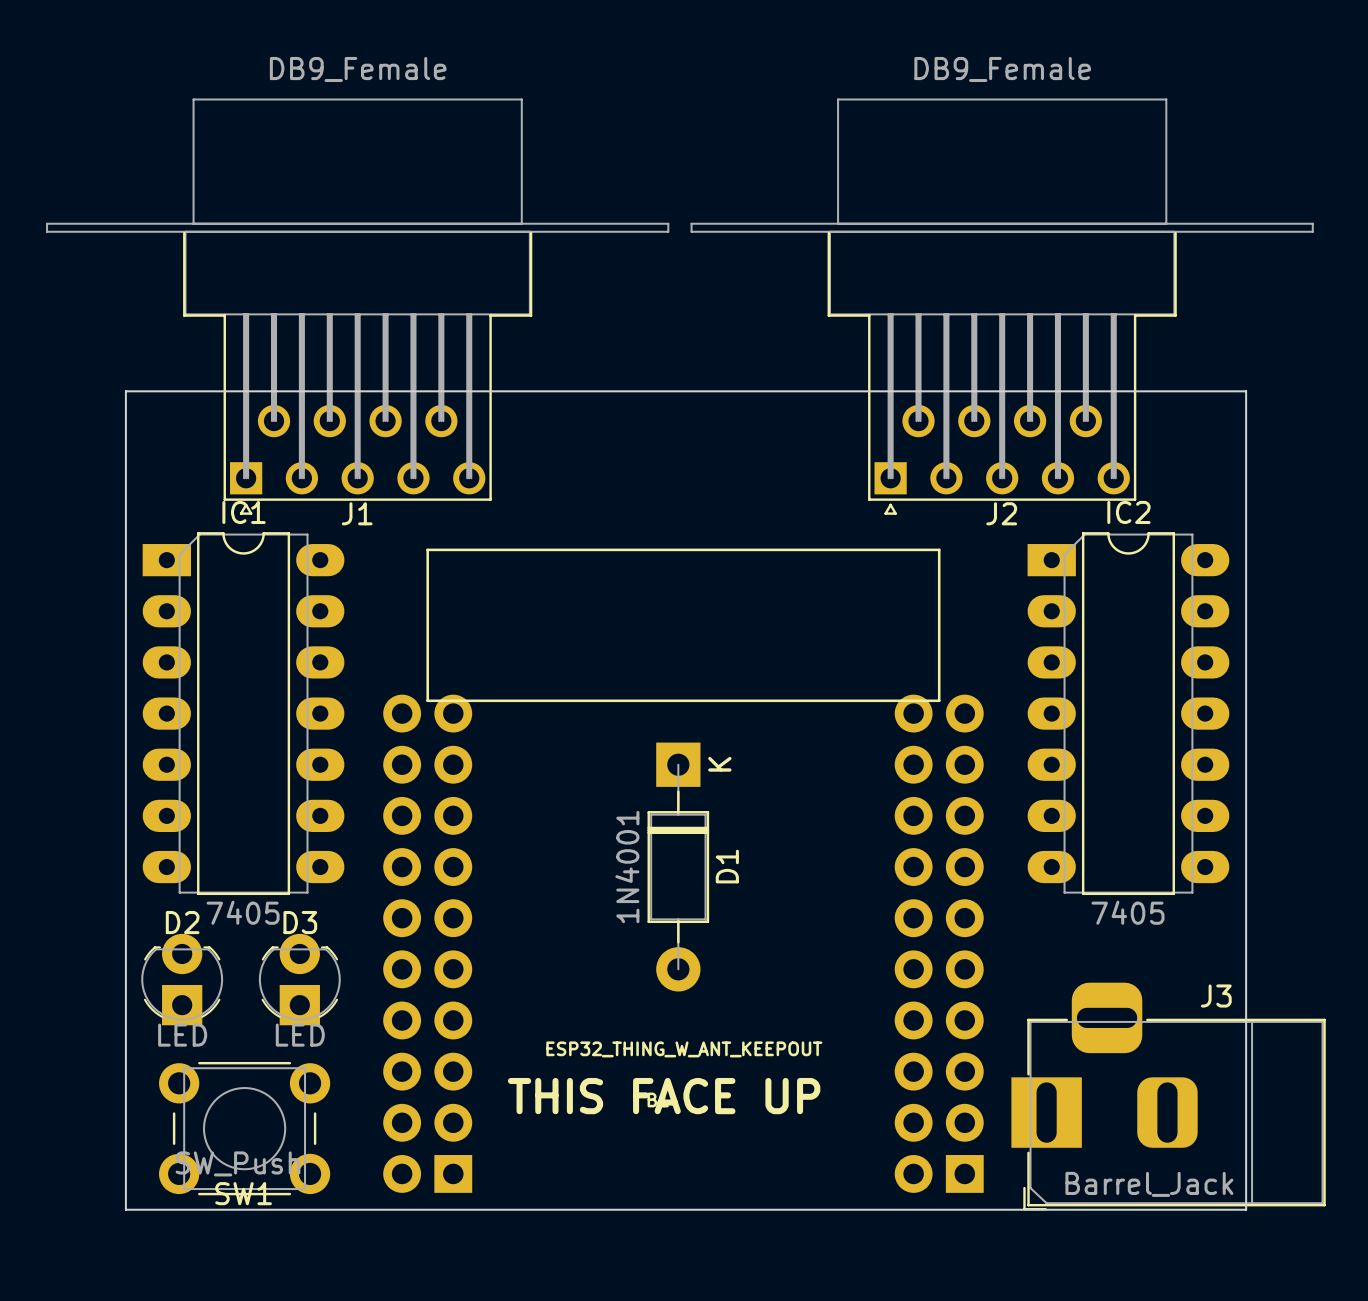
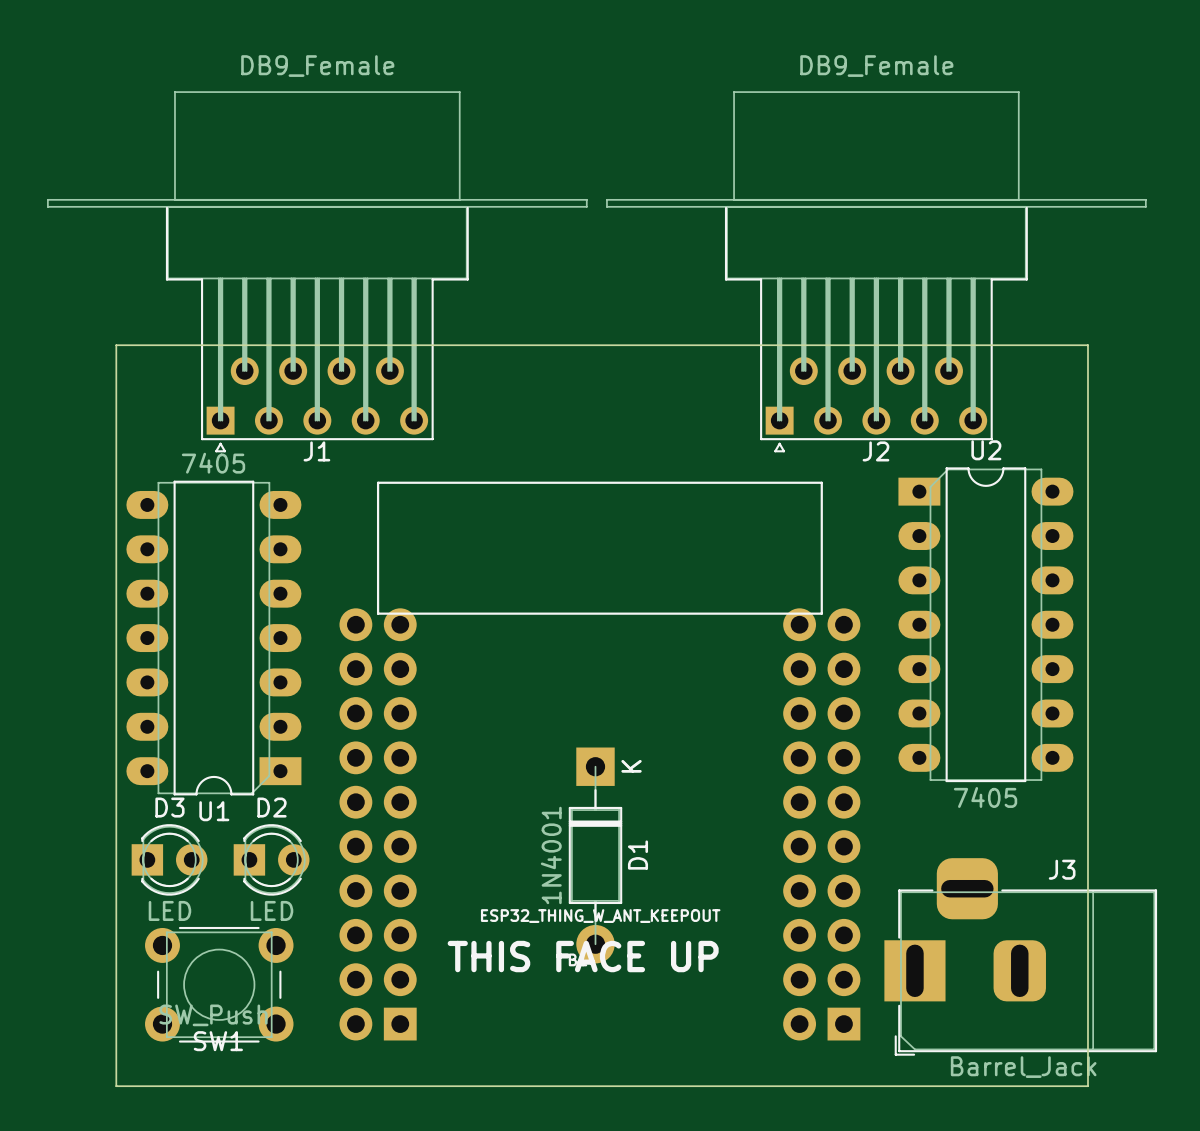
IC2 name: IC2 (1128, 512) -> U2 (986, 450)
IC1: 7405 (243, 713) -> none
U1: none -> 7405 (213, 638)
D1 position: (678, 867) -> (595, 855)
D2 footprint: [141, 933, 224, 1026] -> [233, 824, 310, 896]
D3 footprint: [258, 933, 341, 1026] -> [131, 824, 208, 896]
J3 value position: Barrel_Jack (1149, 1184) -> Barrel_Jack (1023, 1067)
board edge: (125, 1209) (1246, 1209) -> (116, 1055) (116, 1086) (1087, 1086) (1087, 1055)

